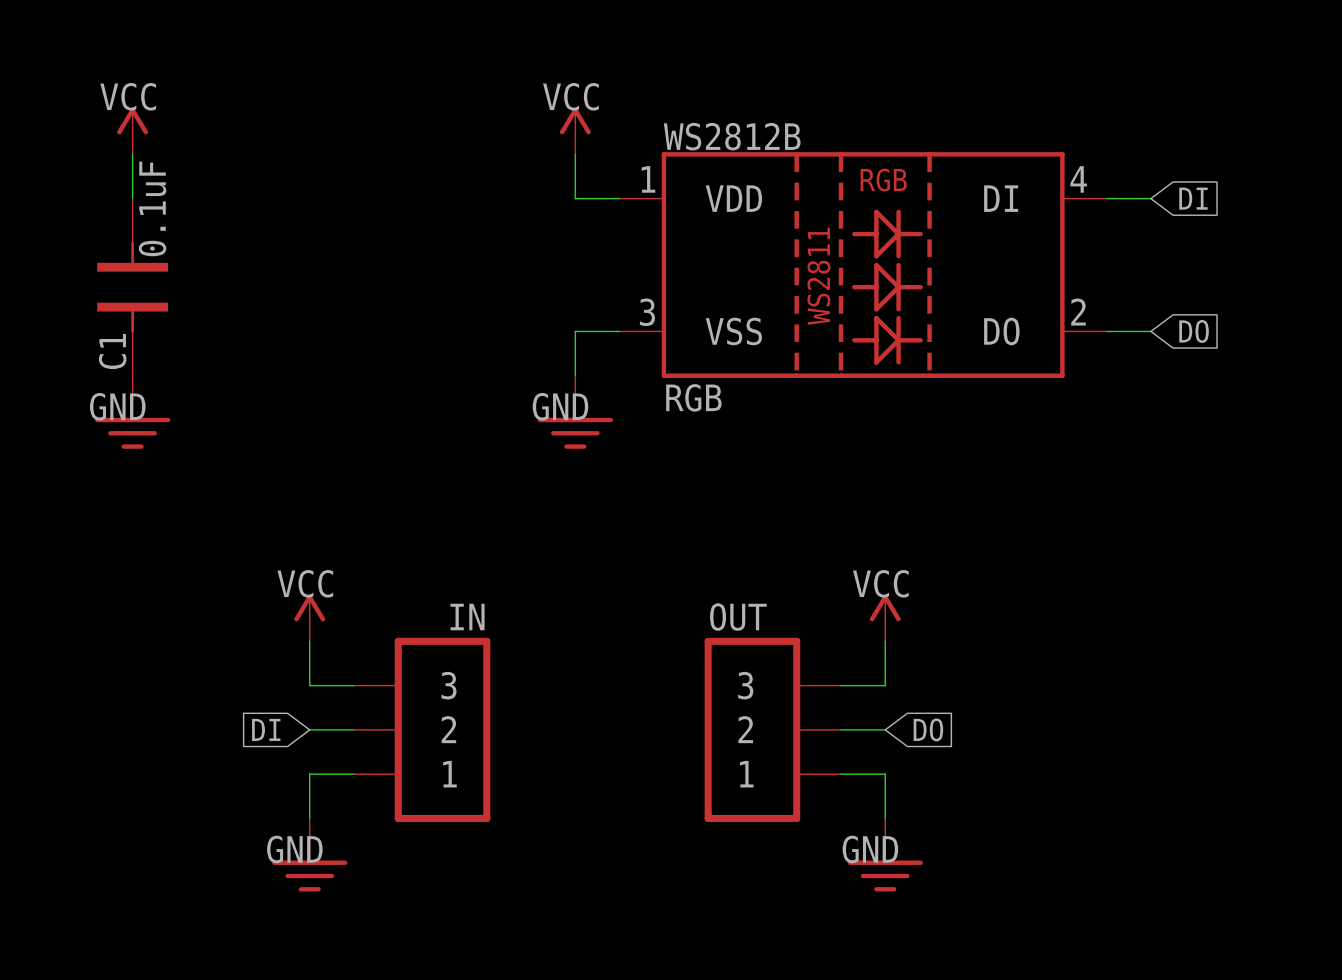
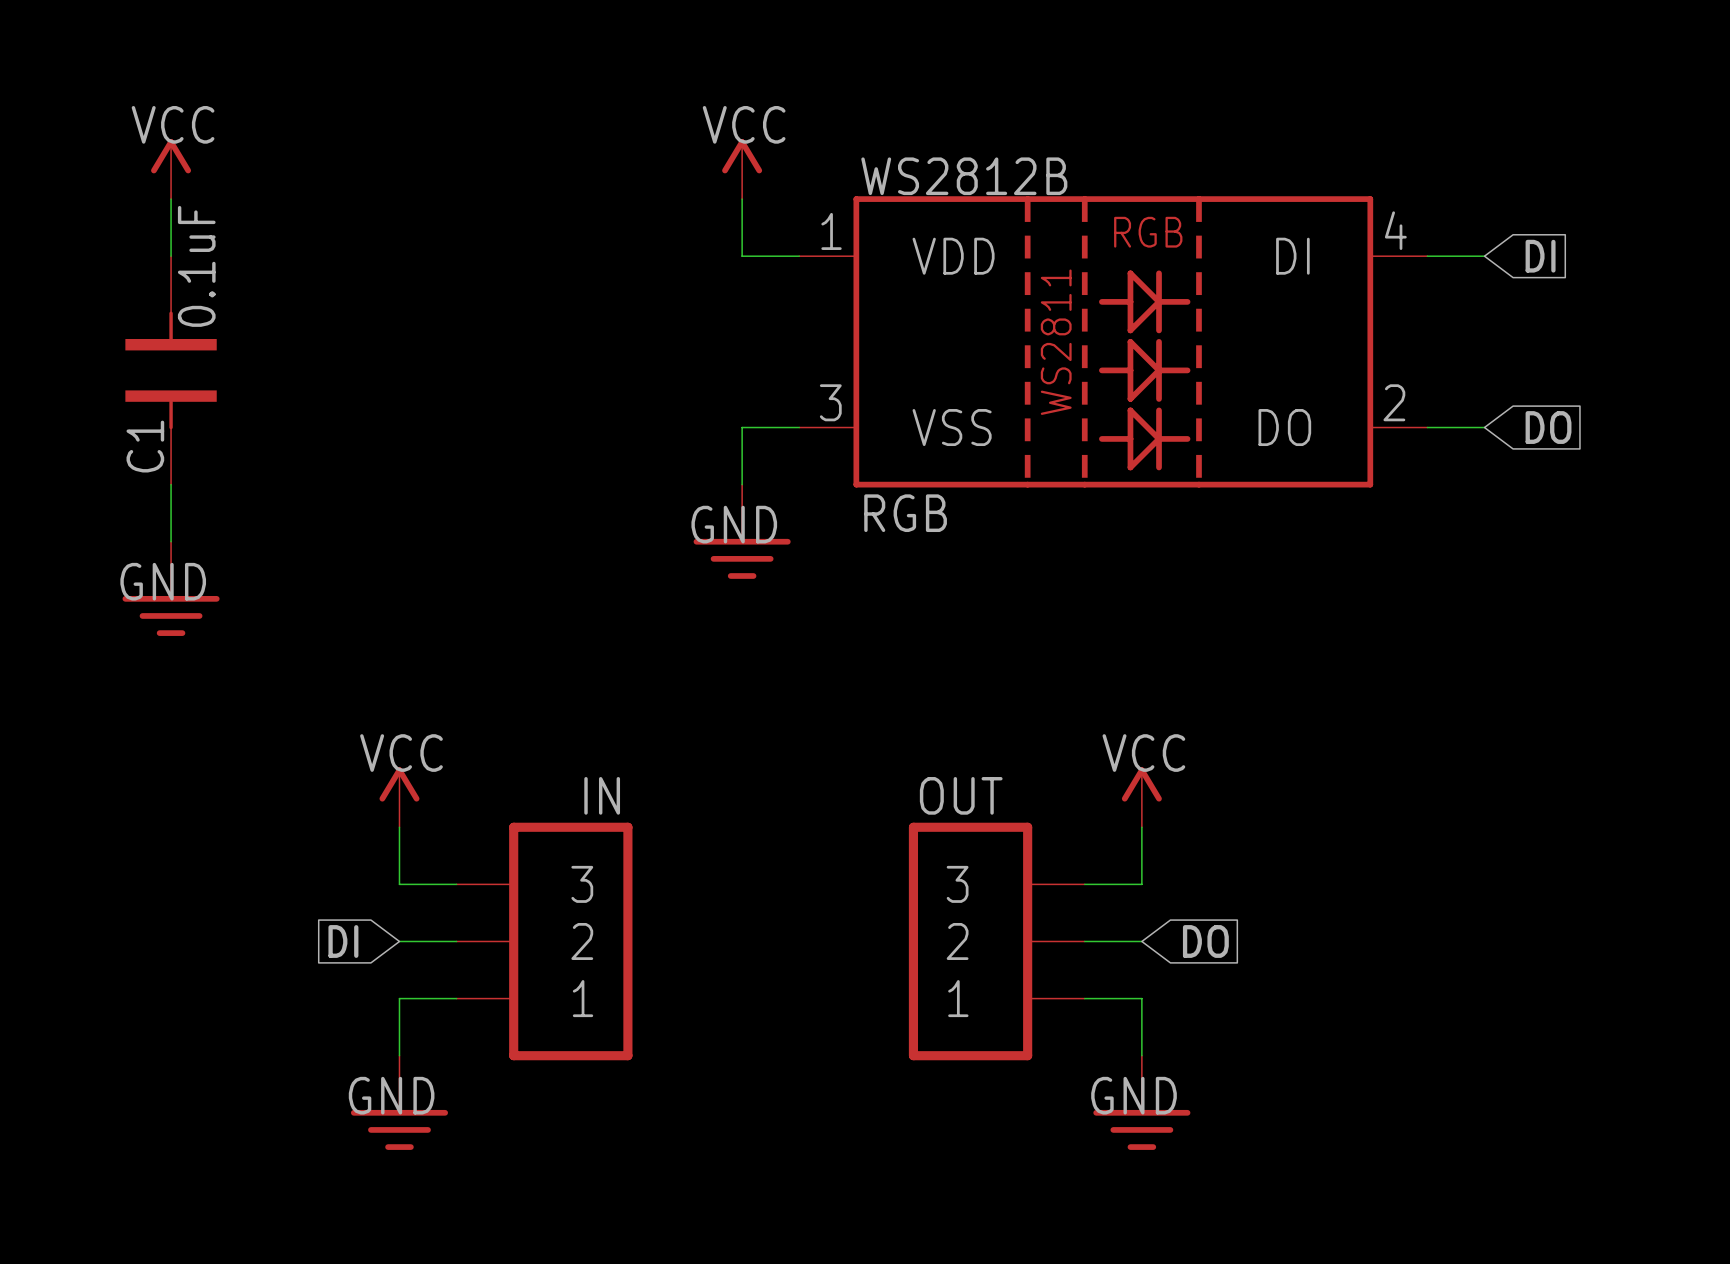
power symbol position: GND (132, 412) -> GND (171, 588)

